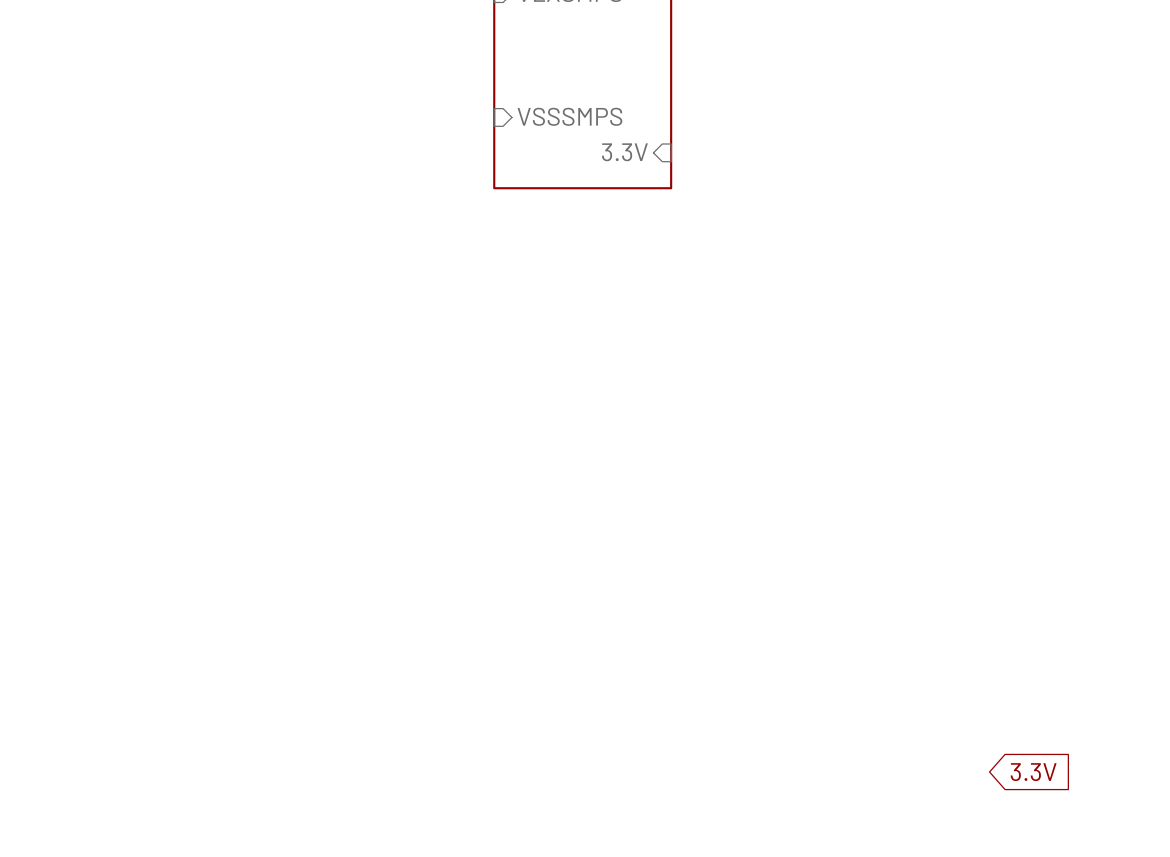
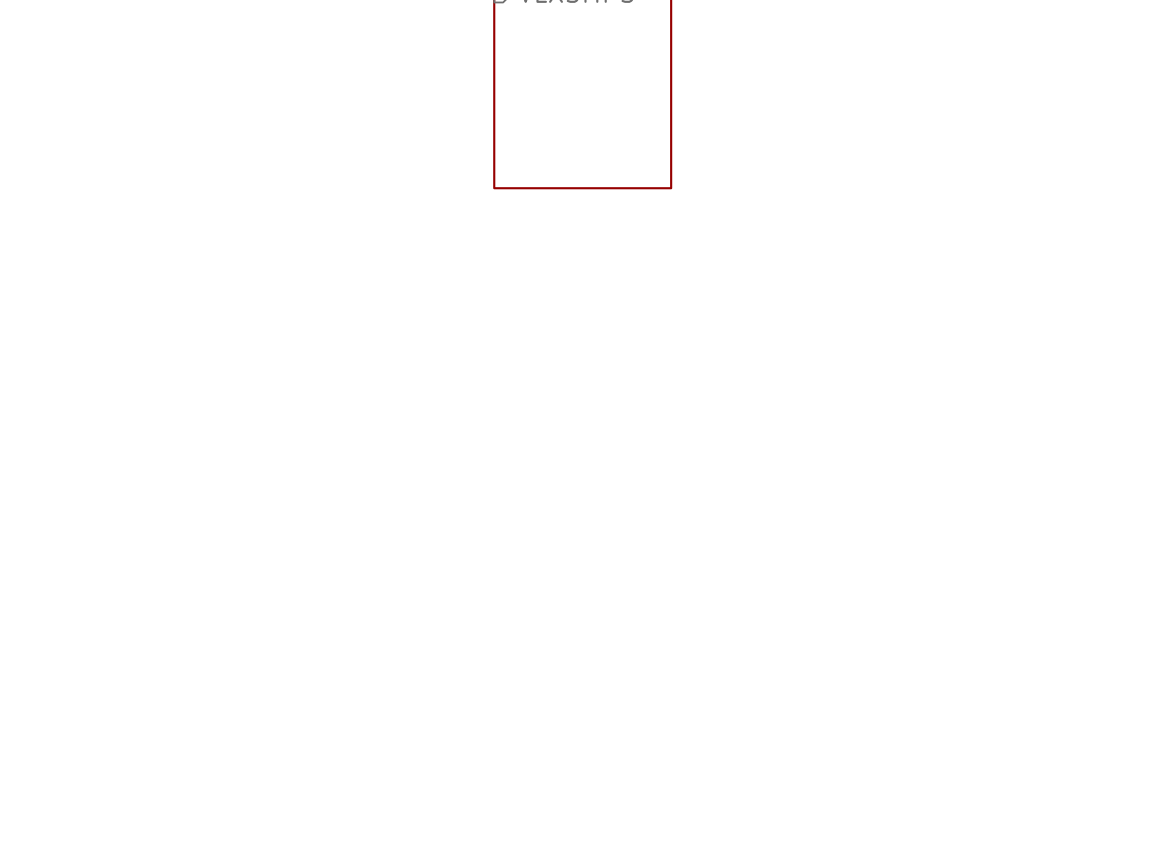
sheet pin: VSSSMPS (569, 116) -> none
sheet pin: 3.3V (624, 152) -> none
global label: 3.3V (1033, 772) -> none

